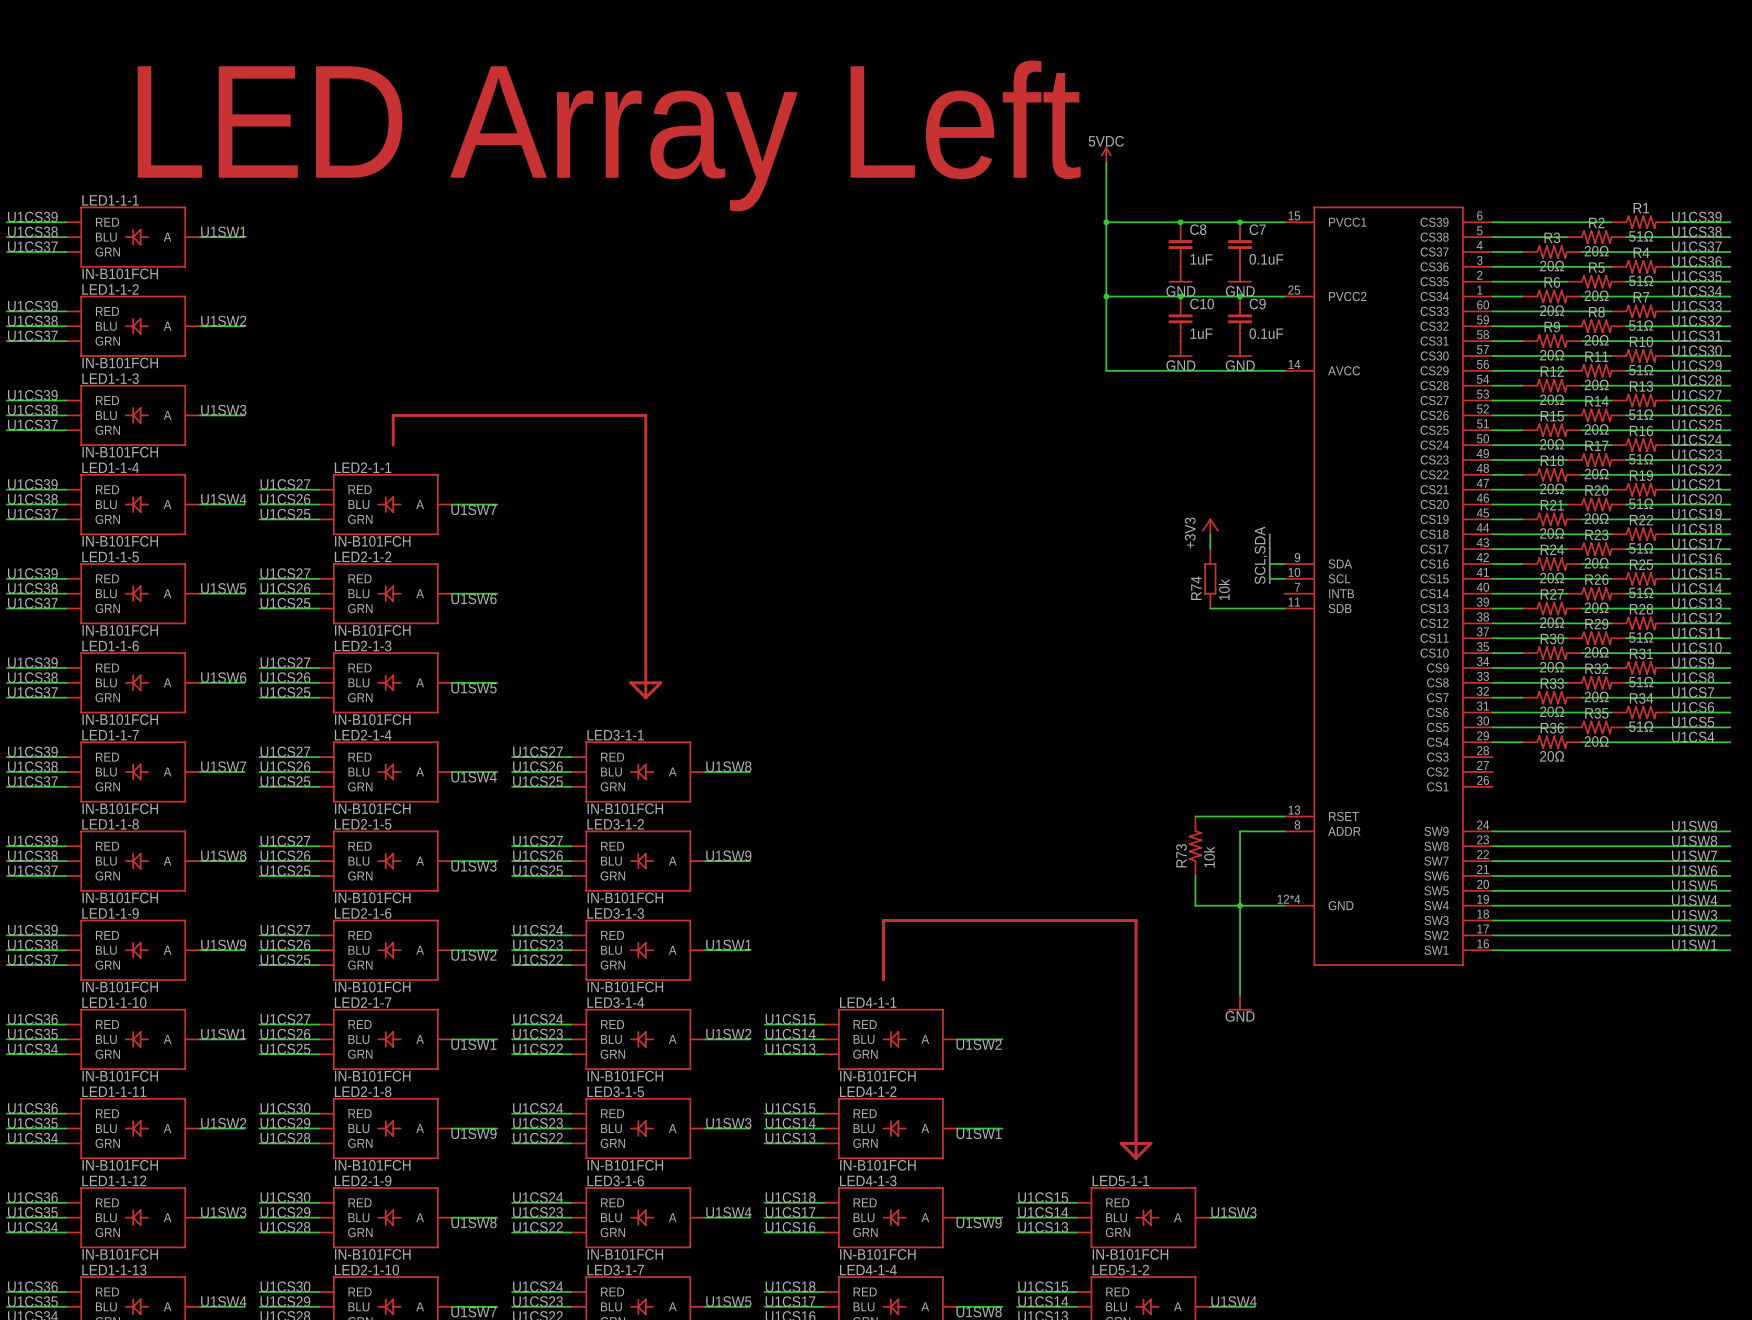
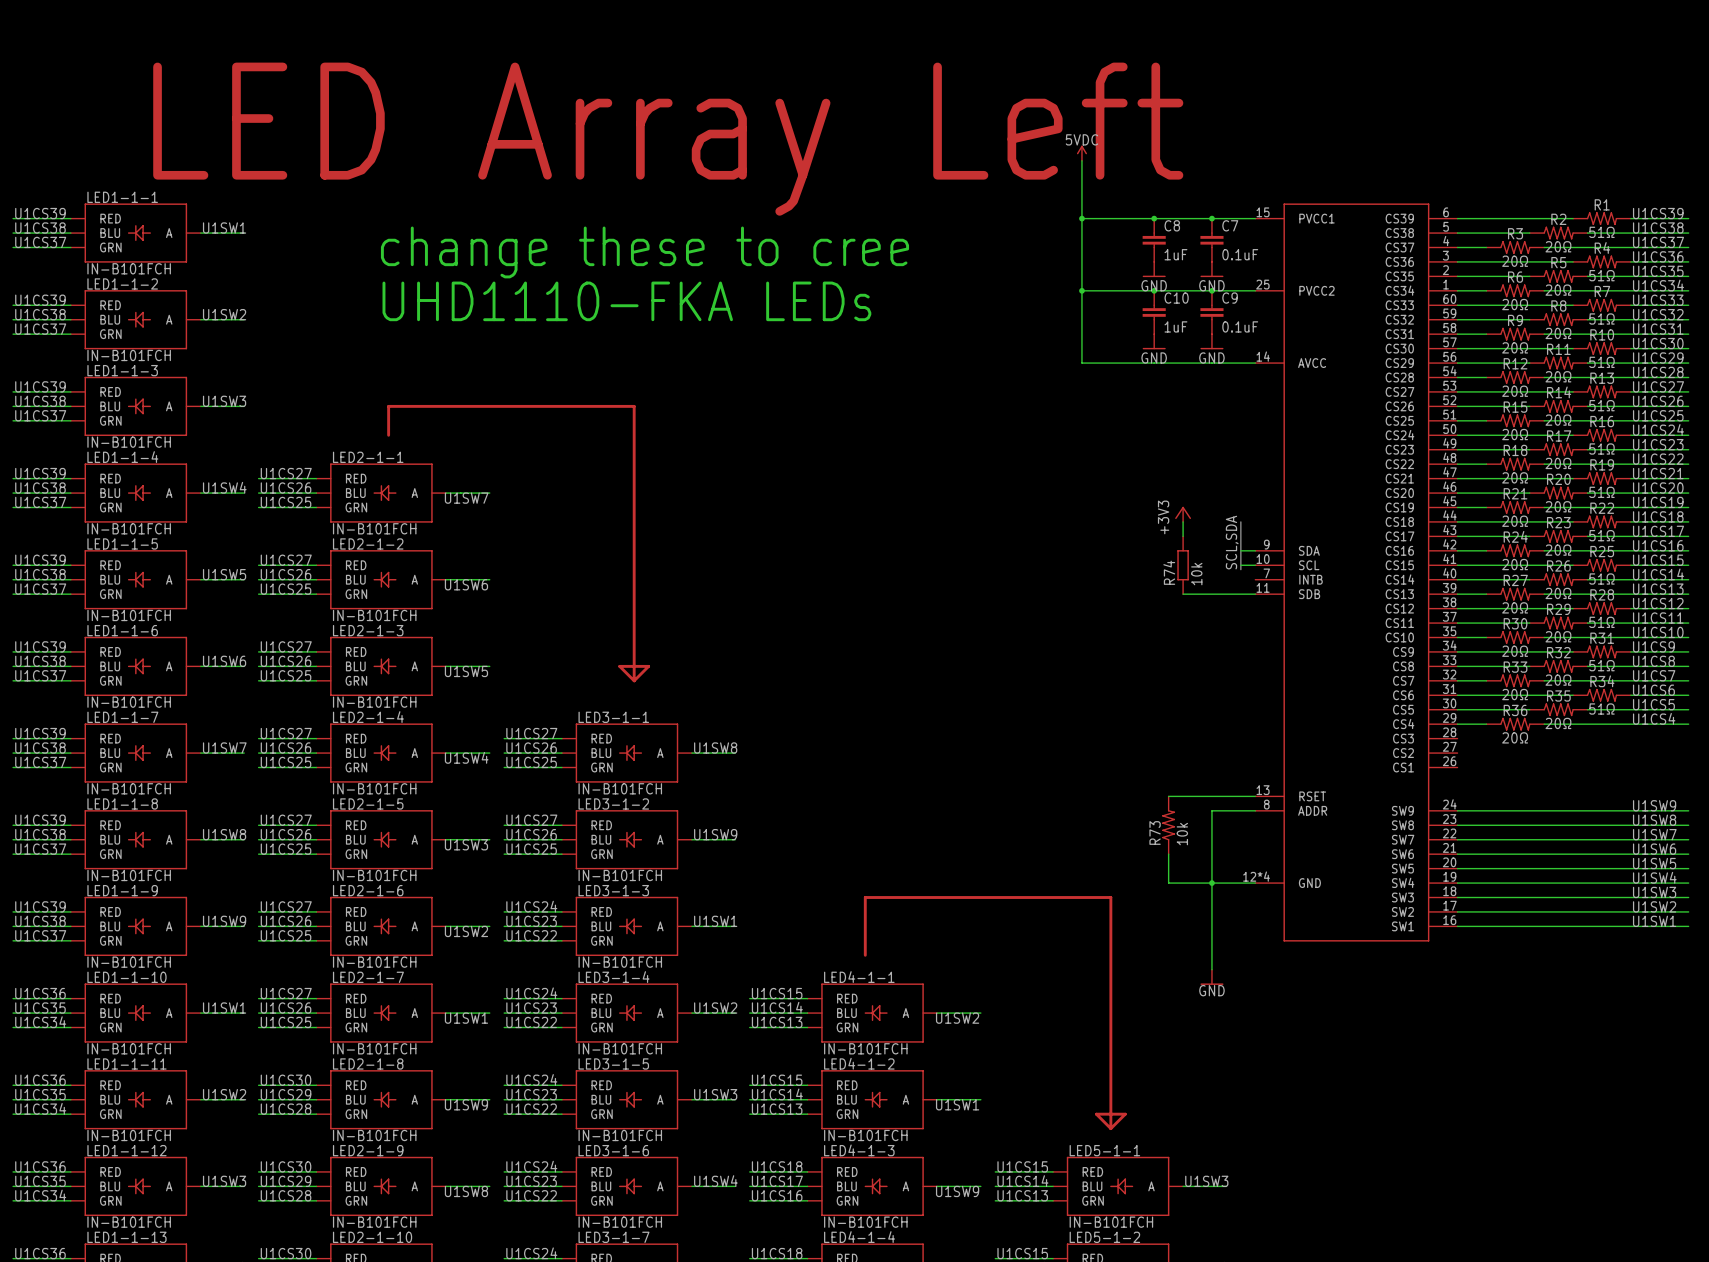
text: none -> change these to cree (644, 252)
text: none -> UHD1110-FKA LEDs (626, 301)

